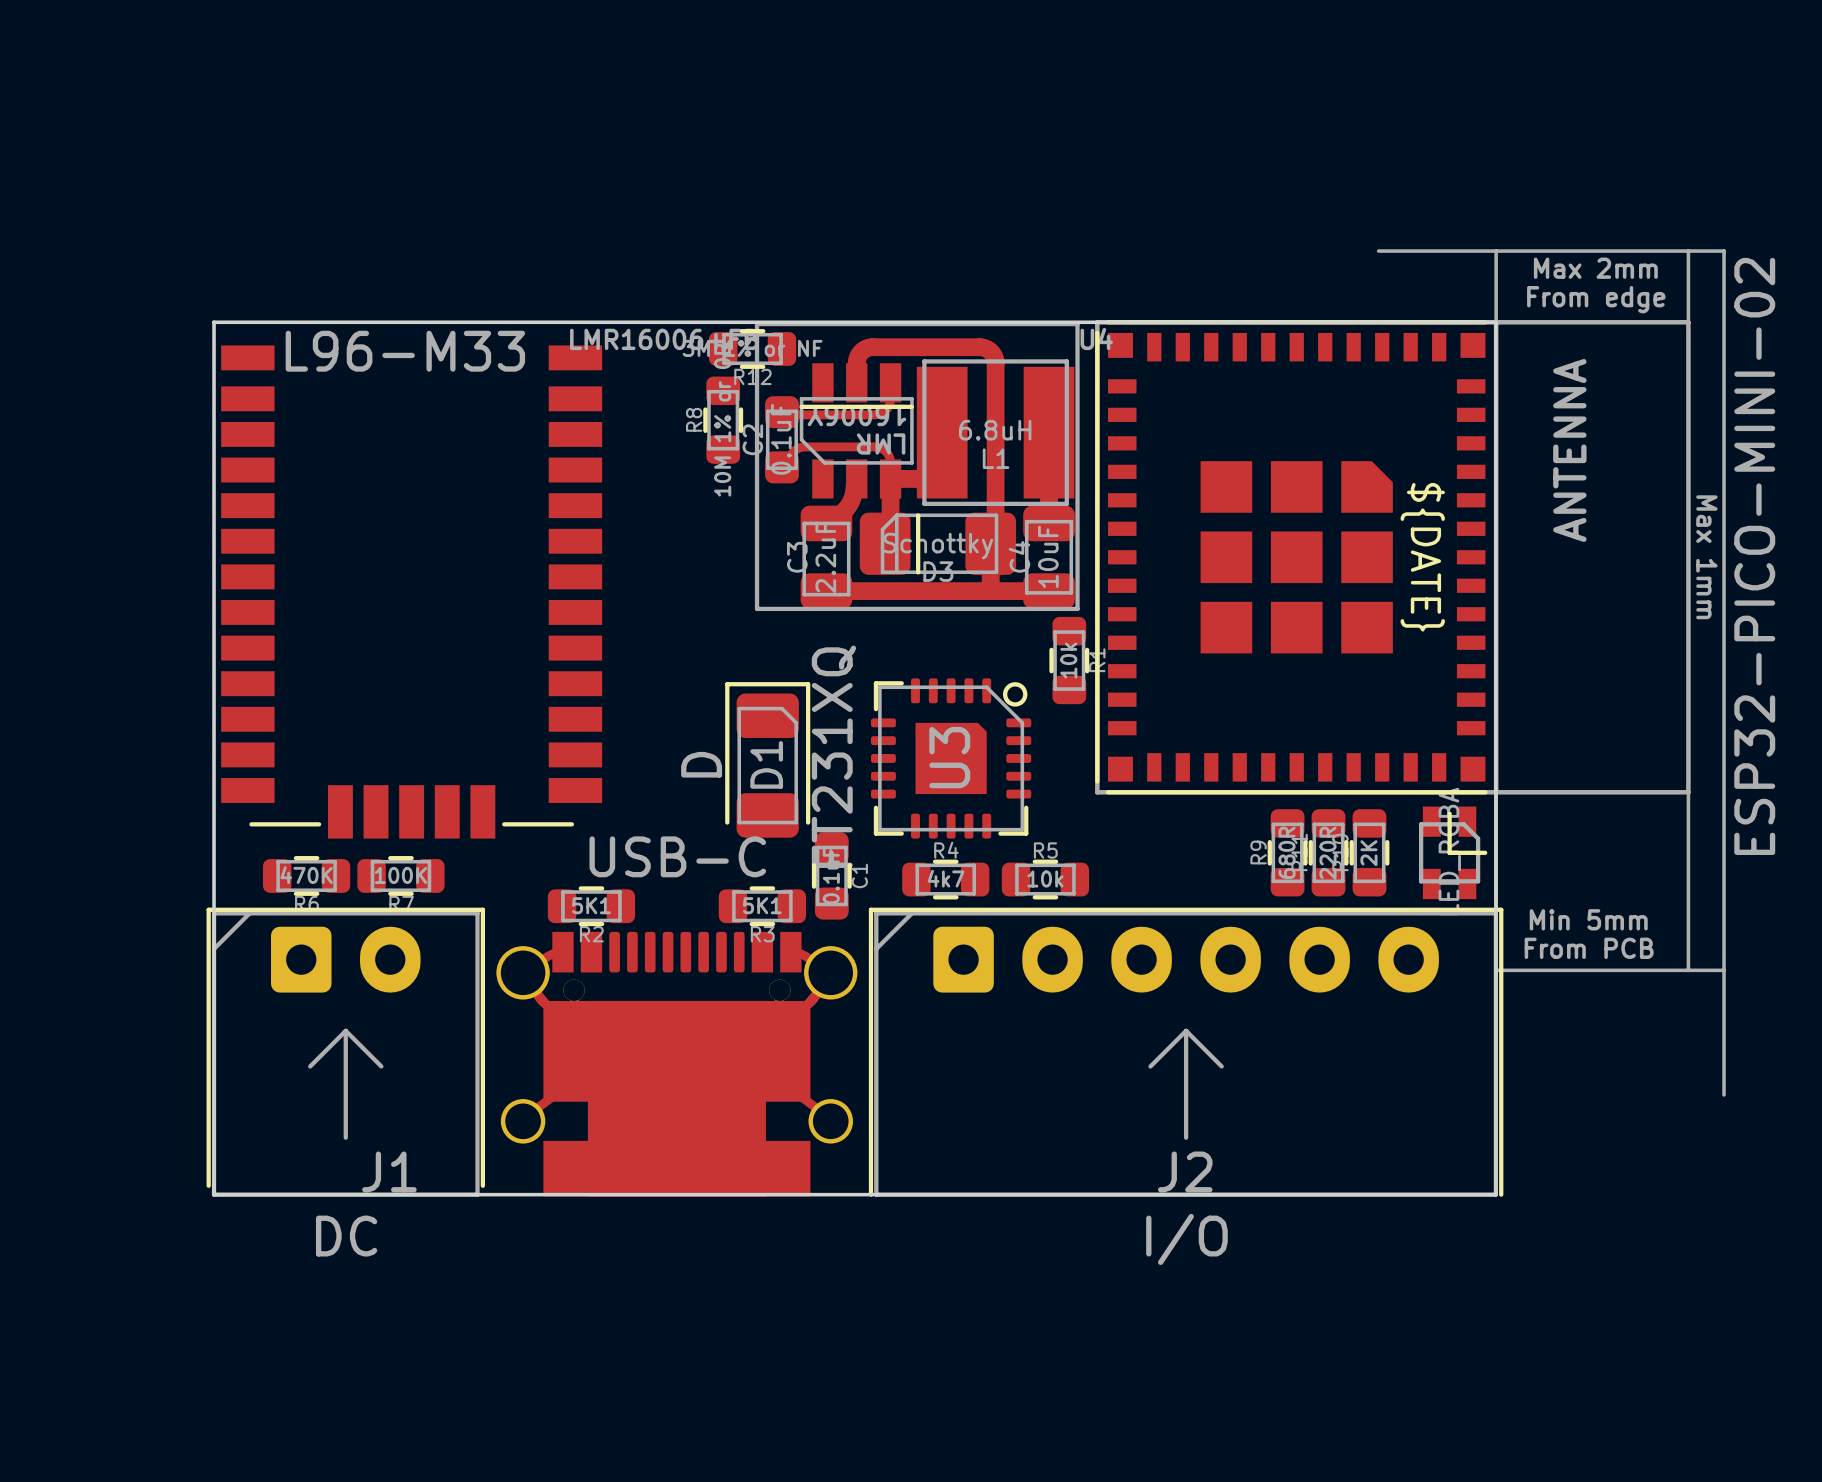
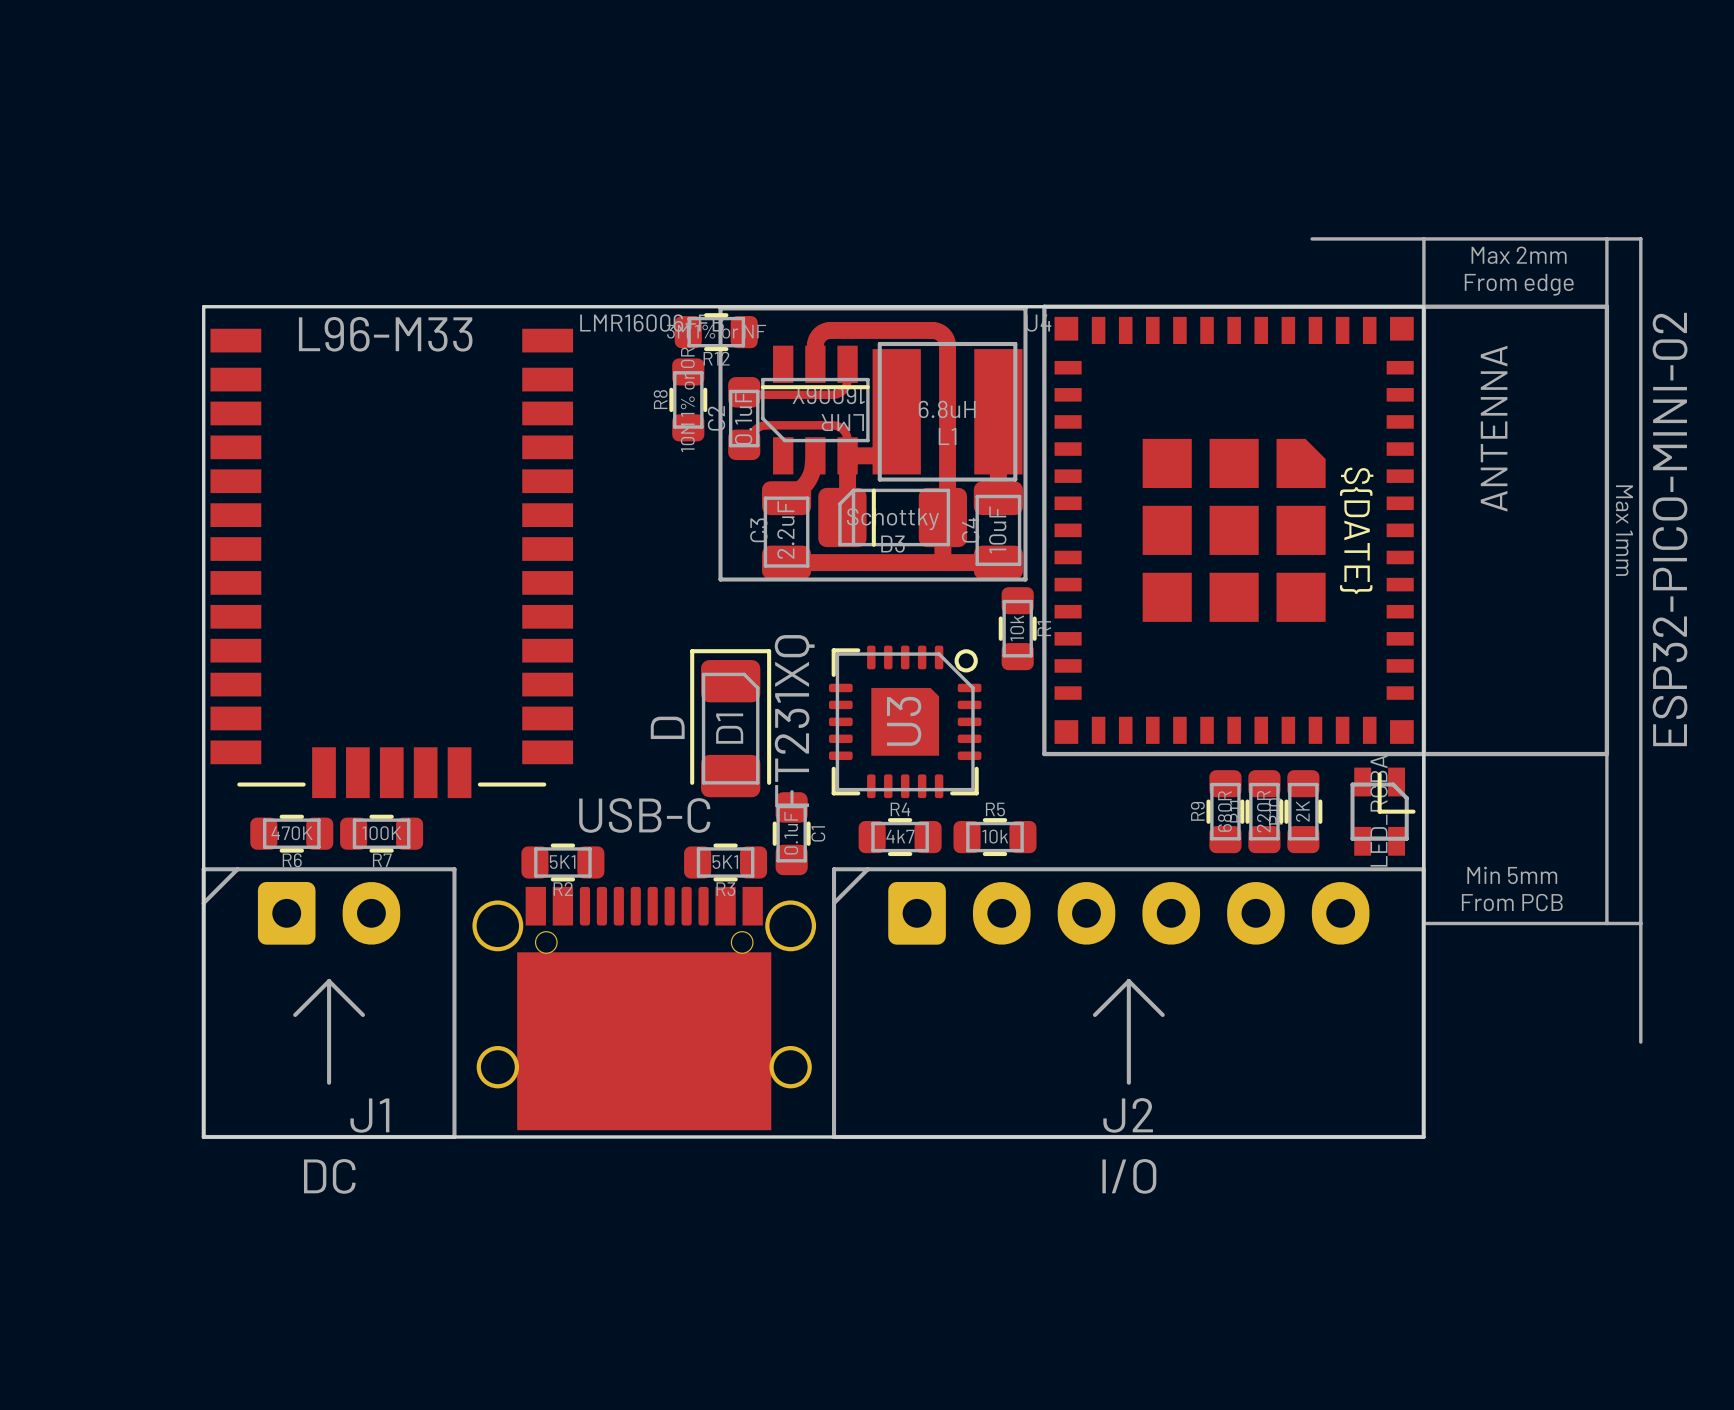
part footprint: [1095, 249, 1726, 1097] -> [1042, 237, 1643, 1044]
J1 footprint: [206, 907, 486, 1197] -> [201, 867, 457, 1140]
J2 footprint: [868, 907, 1504, 1197] -> [831, 867, 1426, 1140]
part footprint: [496, 931, 858, 1197] -> [472, 886, 817, 1131]

